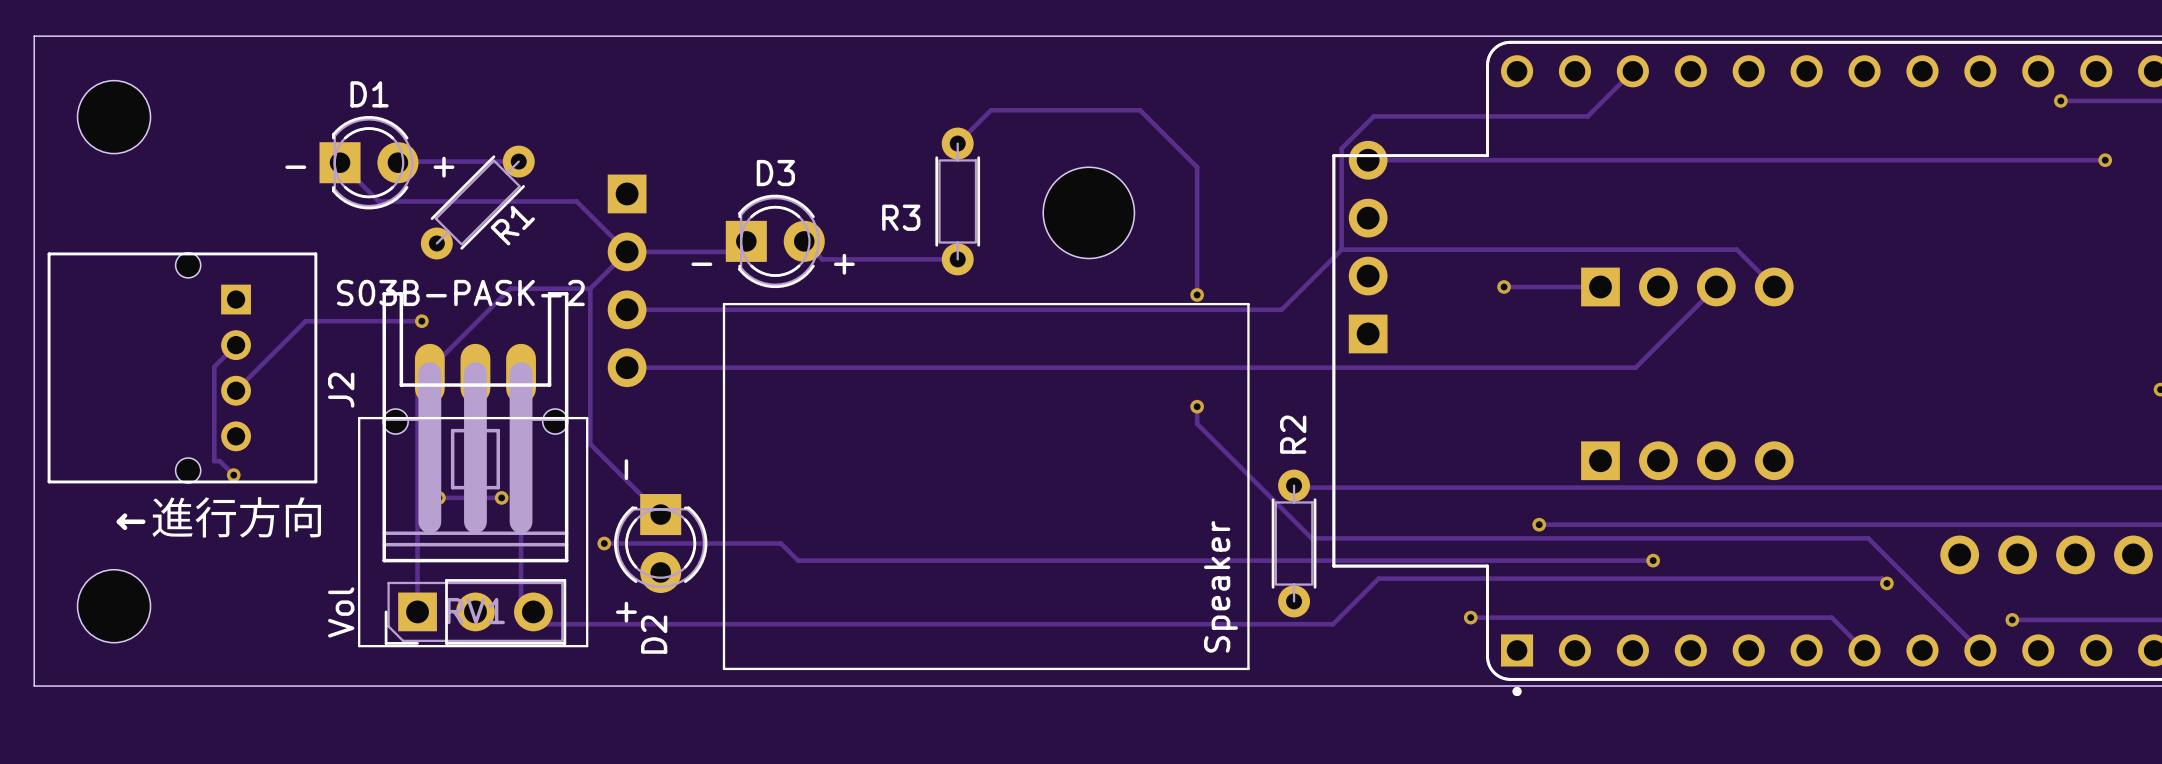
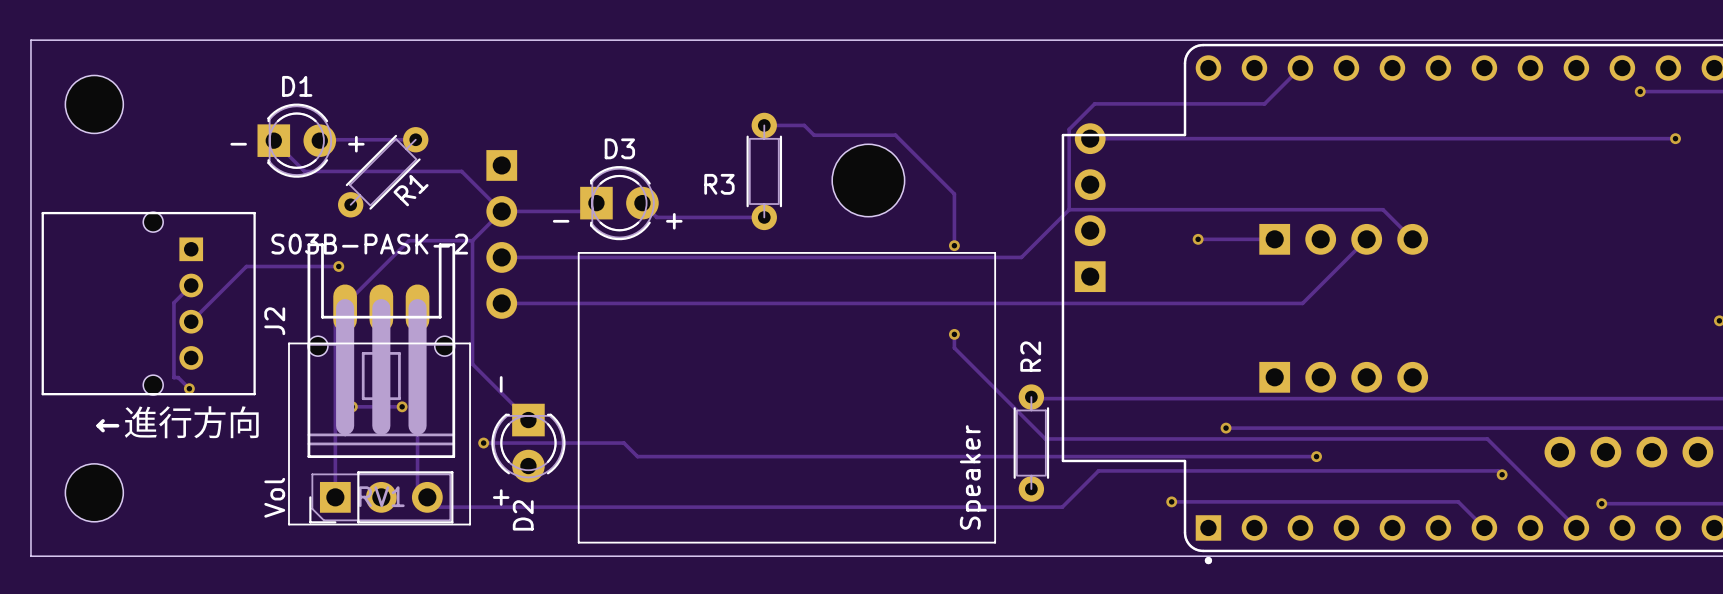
track: (957, 143) (991, 110) (1140, 110) (1197, 167) (1197, 229) -> (764, 125) (804, 125) (814, 135) (895, 135) (954, 194)

